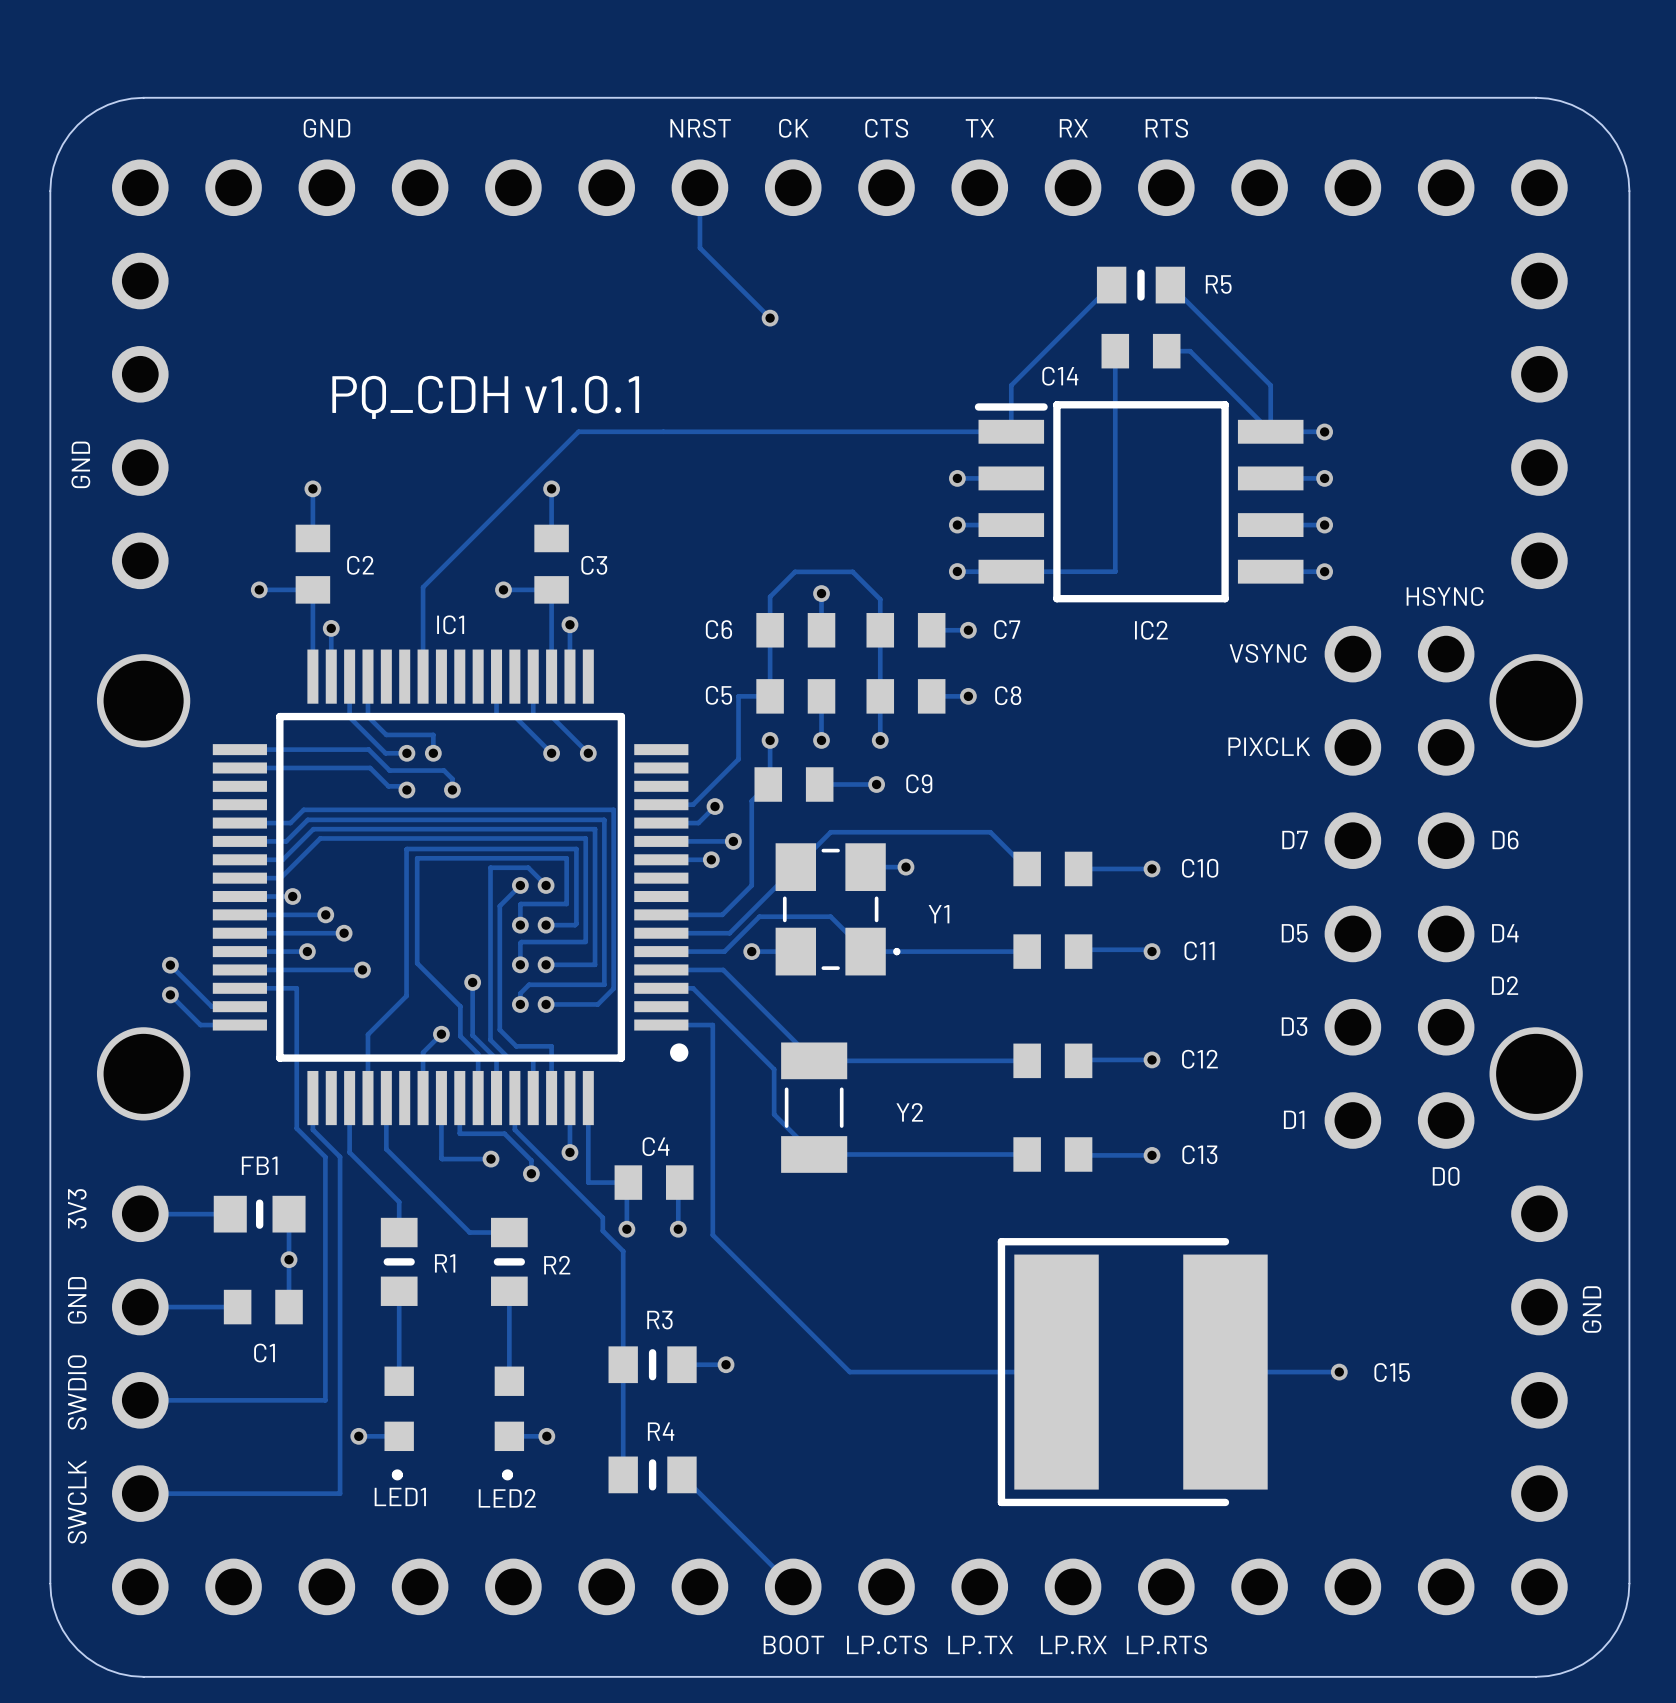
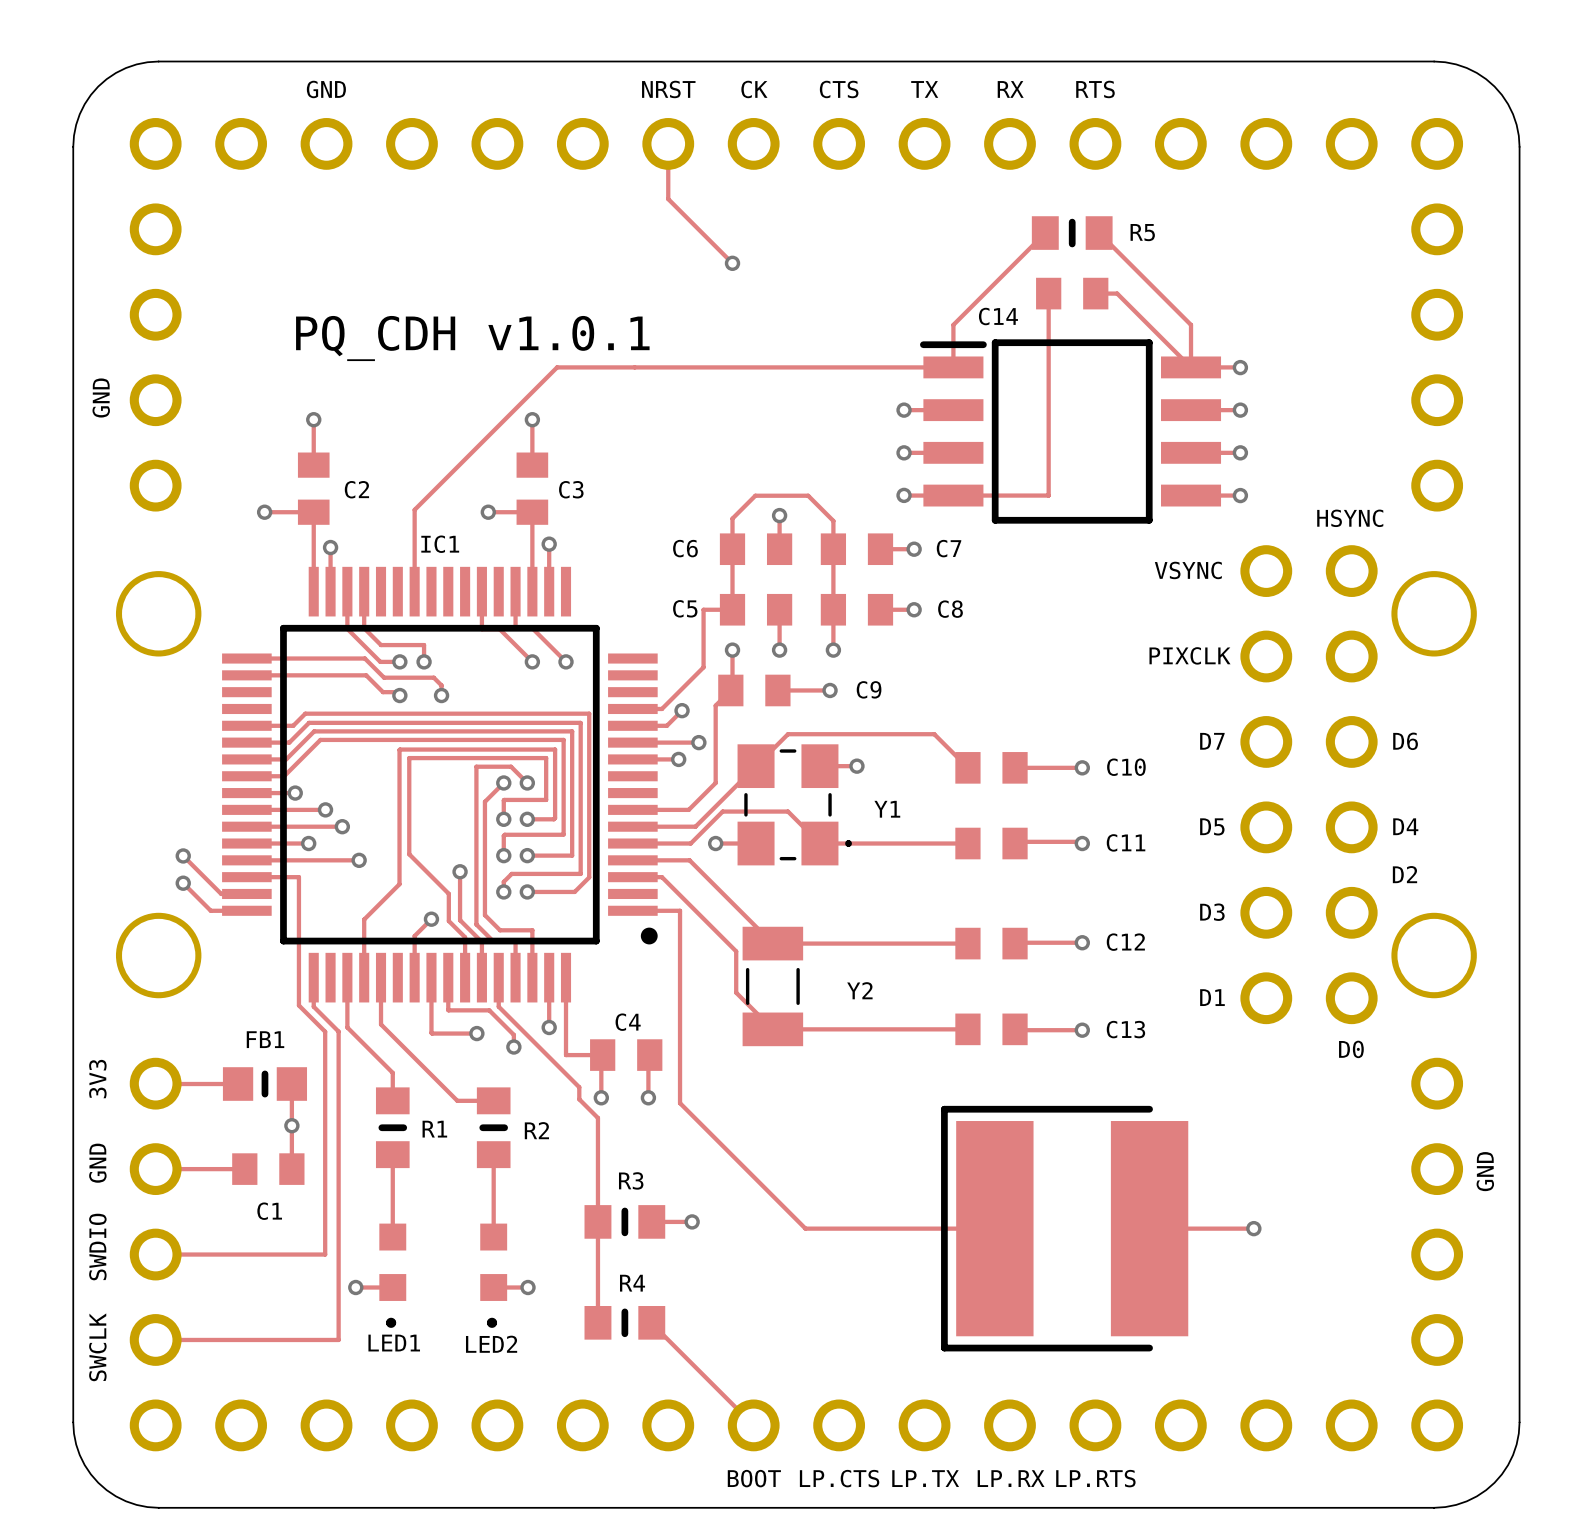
text: IC2 (1151, 630) -> none
text: C15 (1392, 1372) -> none

